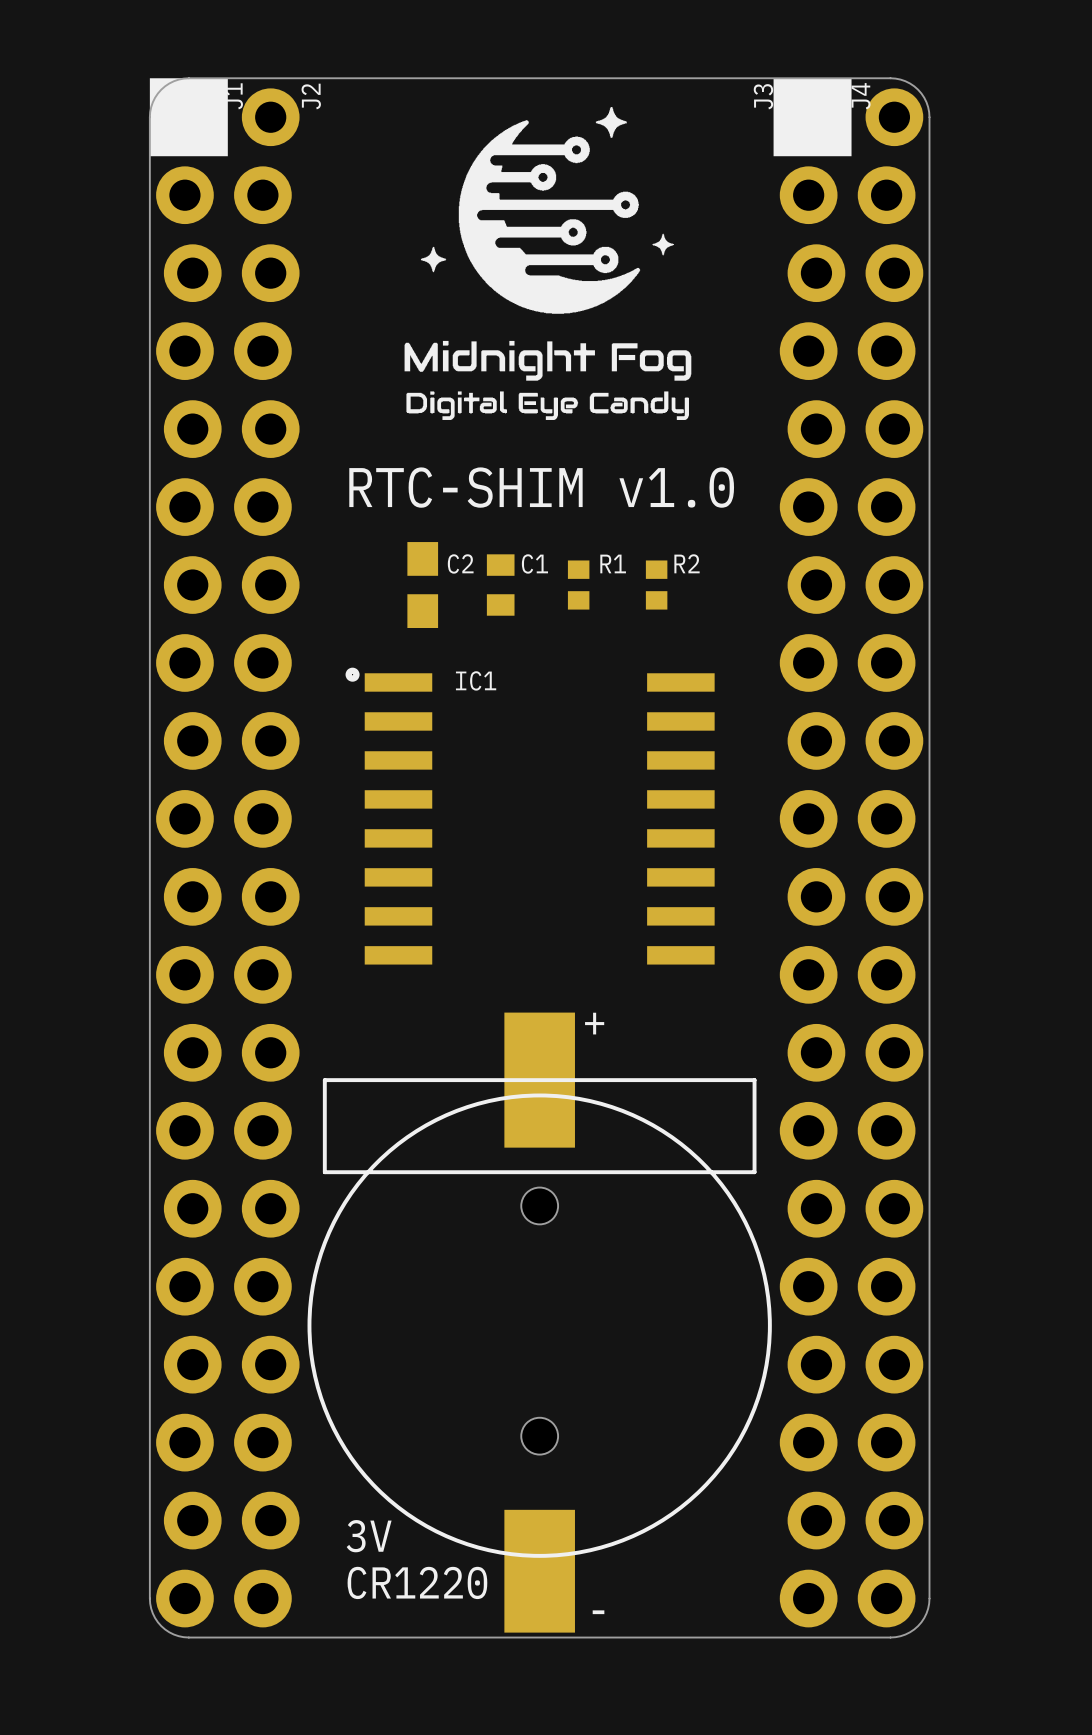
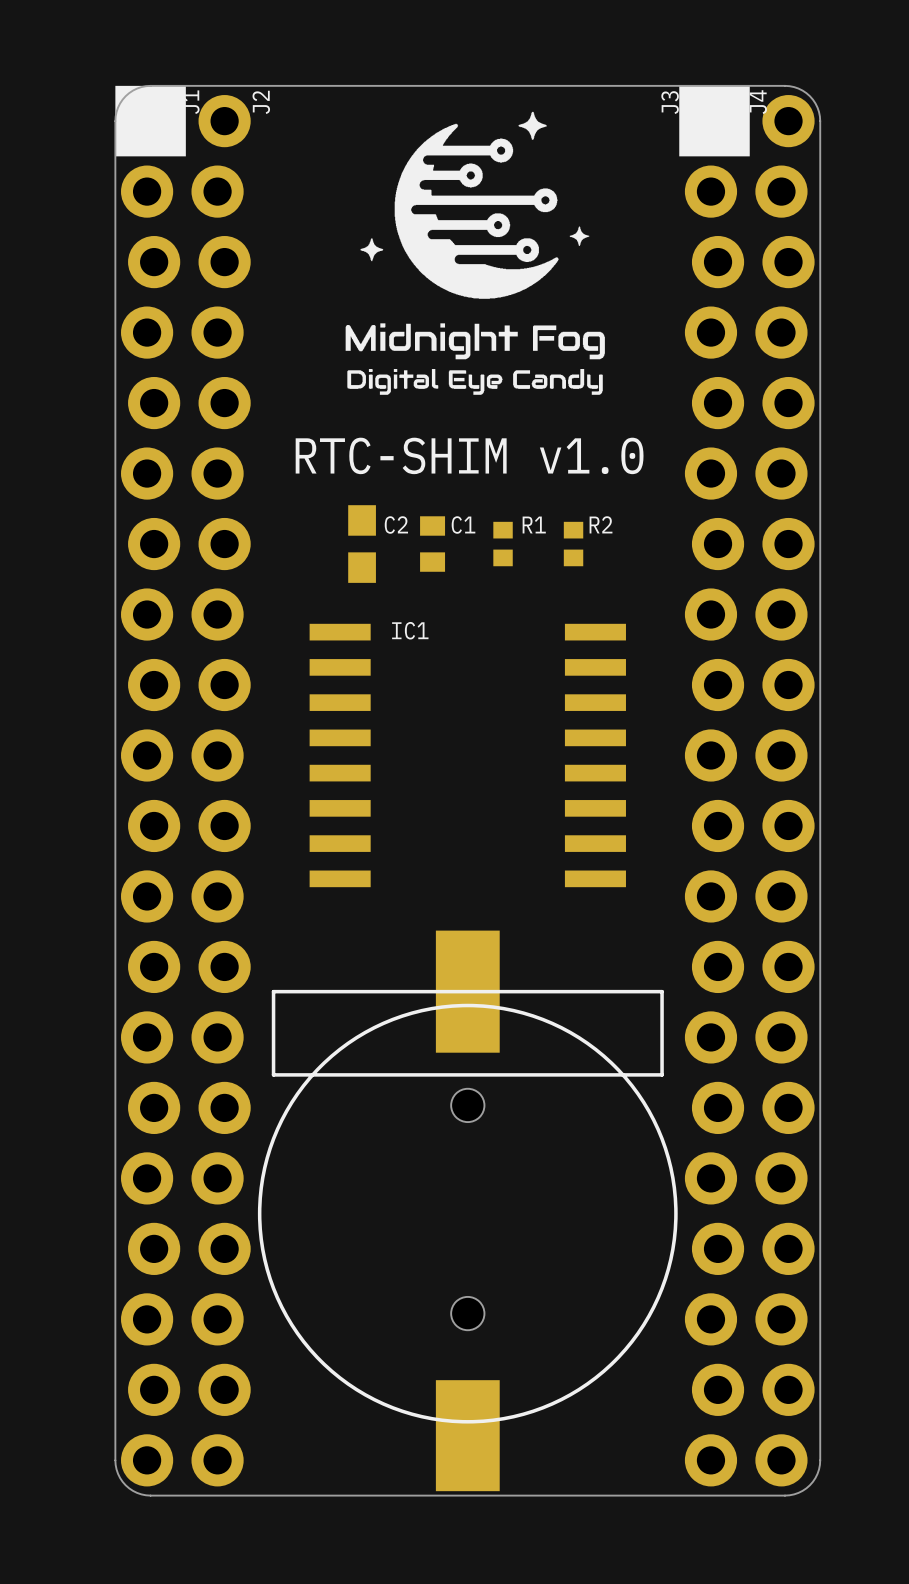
drawing: [345, 667, 360, 682] -> none
text: + (594, 1023) -> none
text: 3V (369, 1536) -> none
text: CR1220 (417, 1582) -> none
text: - (598, 1612) -> none

